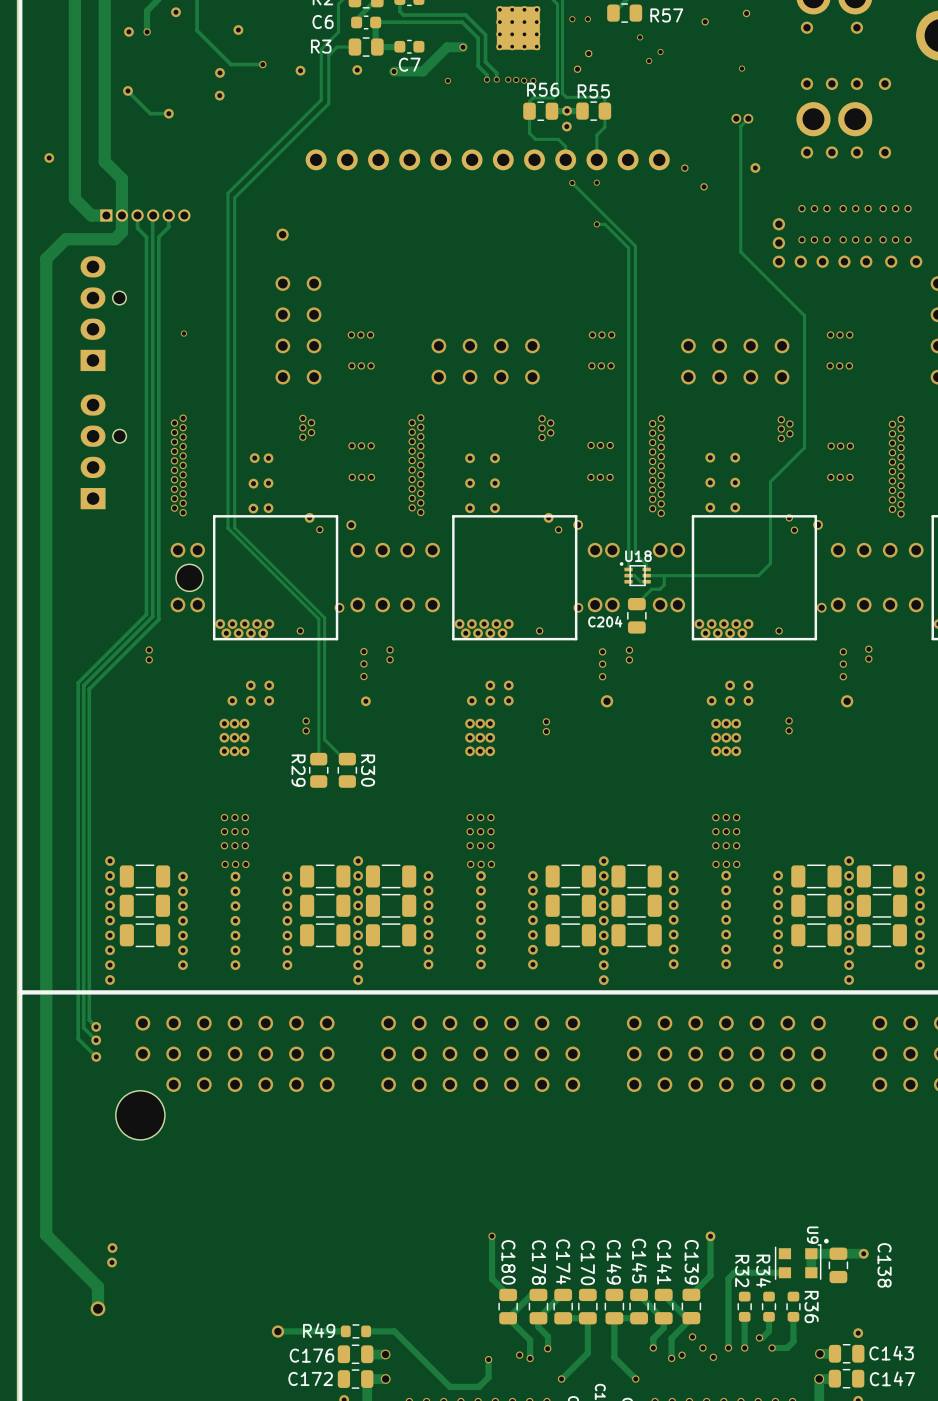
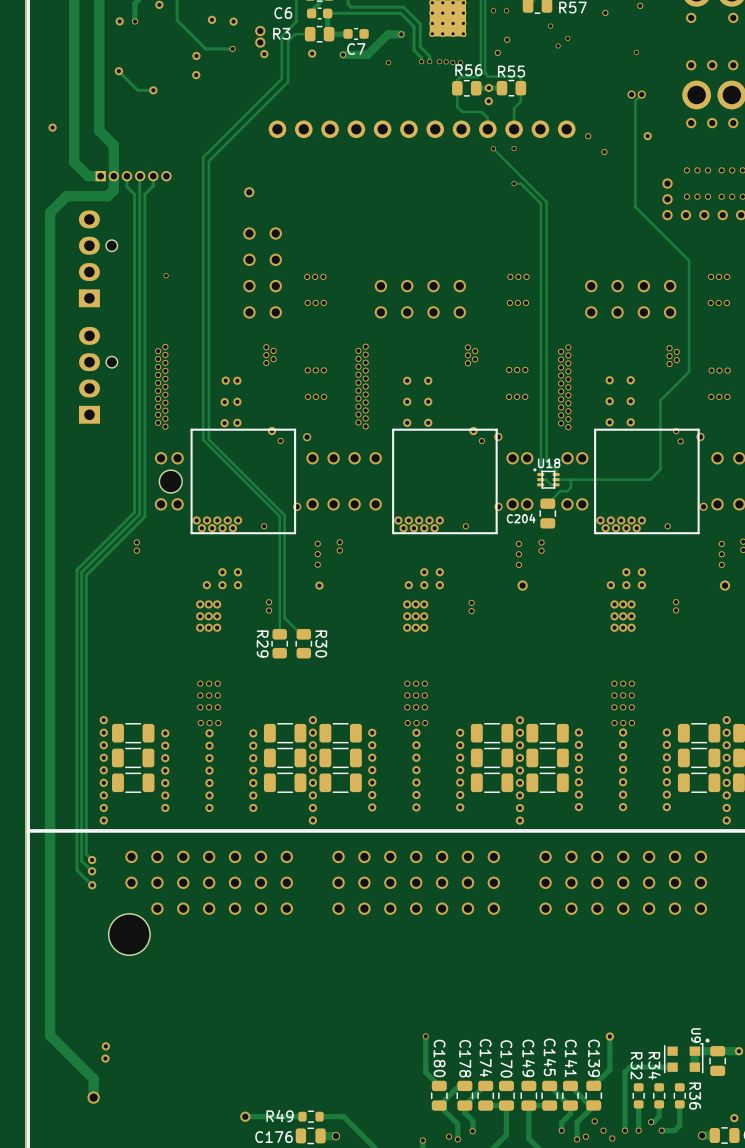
via: none -> (233, 21)
via: none -> (260, 31)
via: none -> (260, 42)

